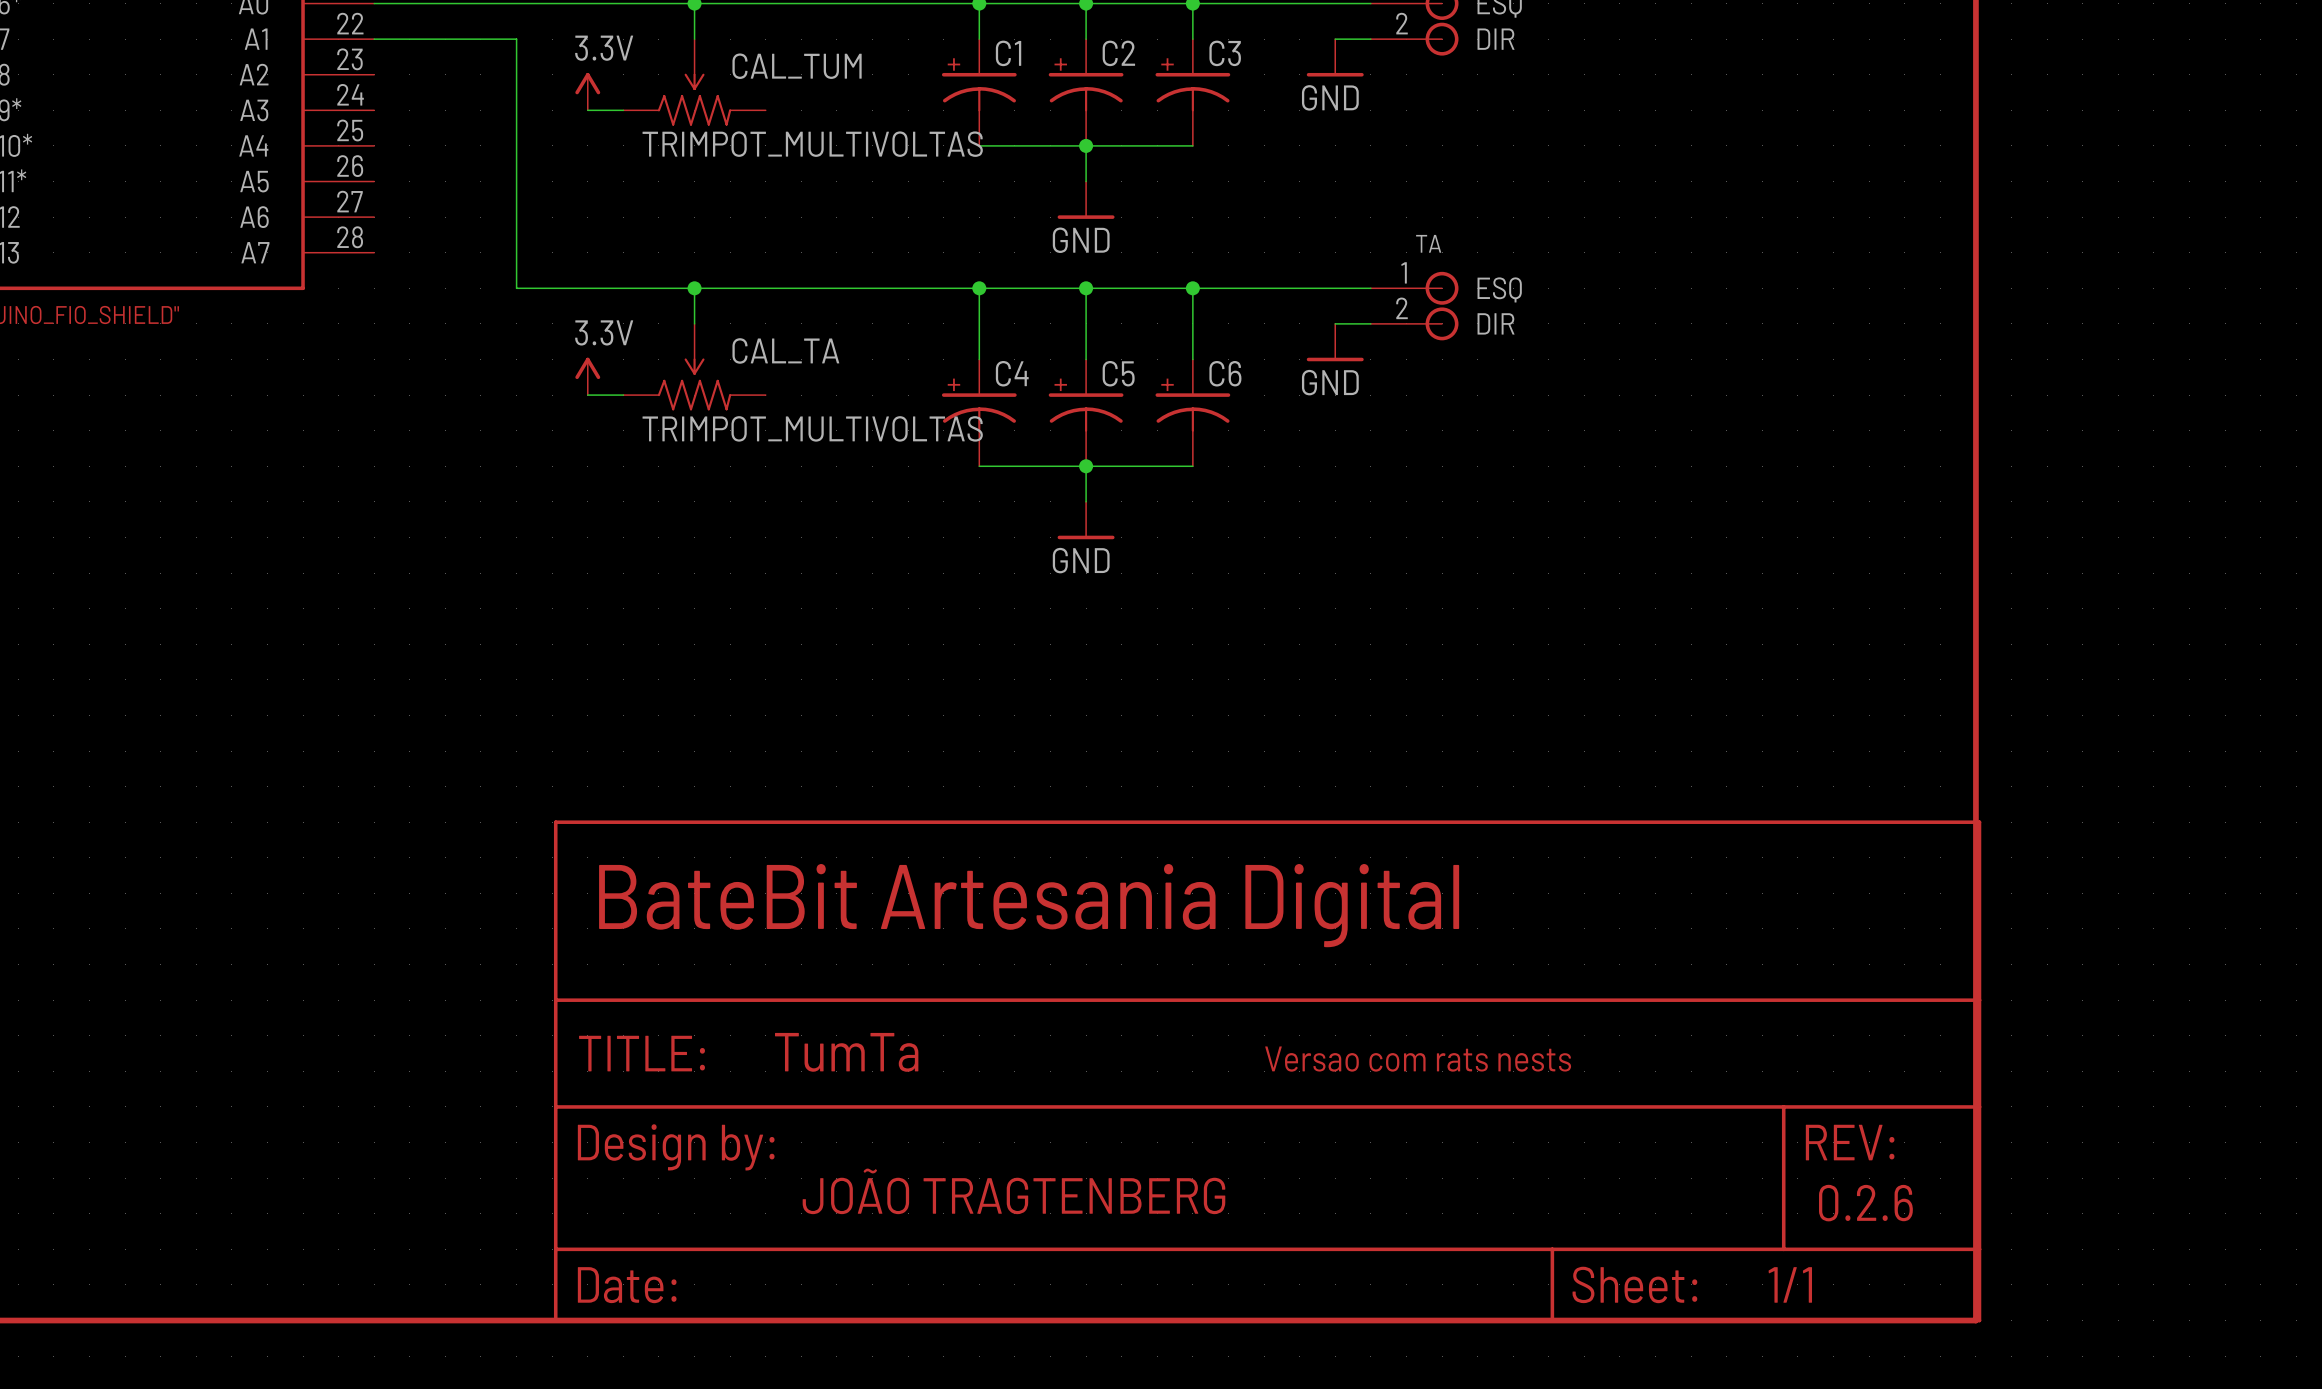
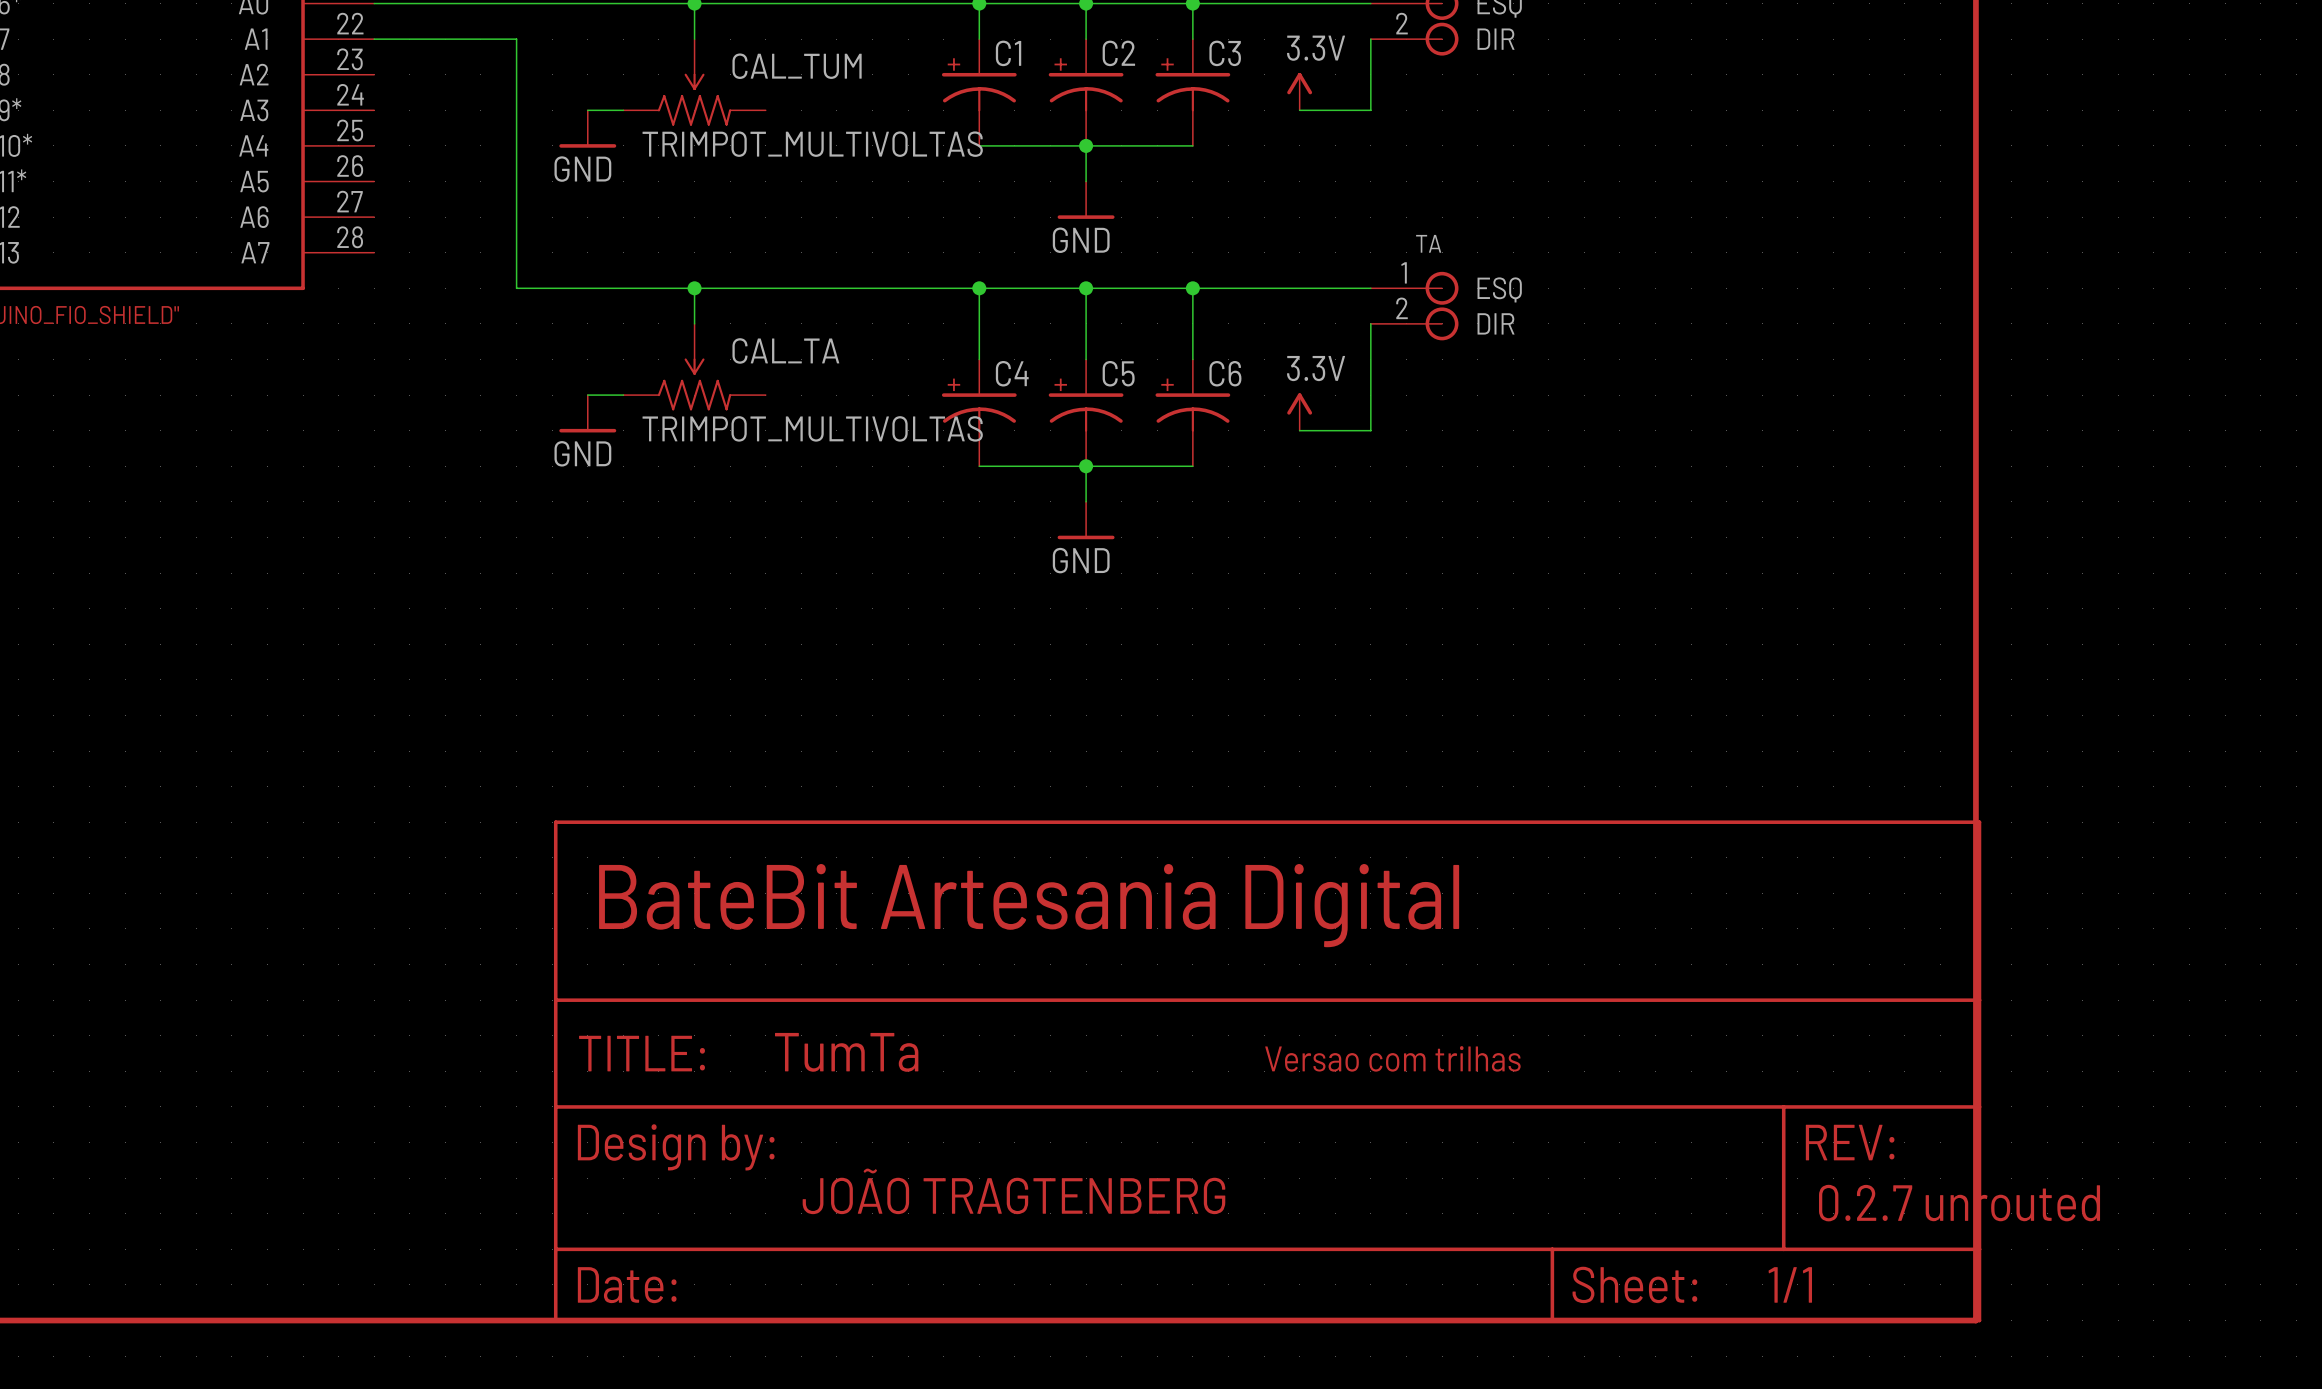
wire: (1335, 39) (1370, 39) -> (1299, 110) (1370, 110) (1370, 39)
power symbol: GND (1335, 57) -> none
power symbol: 3.3V (587, 91) -> none
power symbol: none -> 3.3V (1299, 91)
power symbol: none -> GND (587, 129)
wire: (1335, 323) (1370, 323) -> (1299, 430) (1370, 430) (1370, 323)
power symbol: GND (1335, 342) -> none
power symbol: 3.3V (587, 376) -> none
power symbol: none -> 3.3V (1299, 411)
power symbol: none -> GND (587, 413)
text: Versao com rats nests (1418, 1059) -> Versao com trilhas (1392, 1058)
text: 0.2.6 (1865, 1203) -> 0.2.7 unrouted (1959, 1203)

